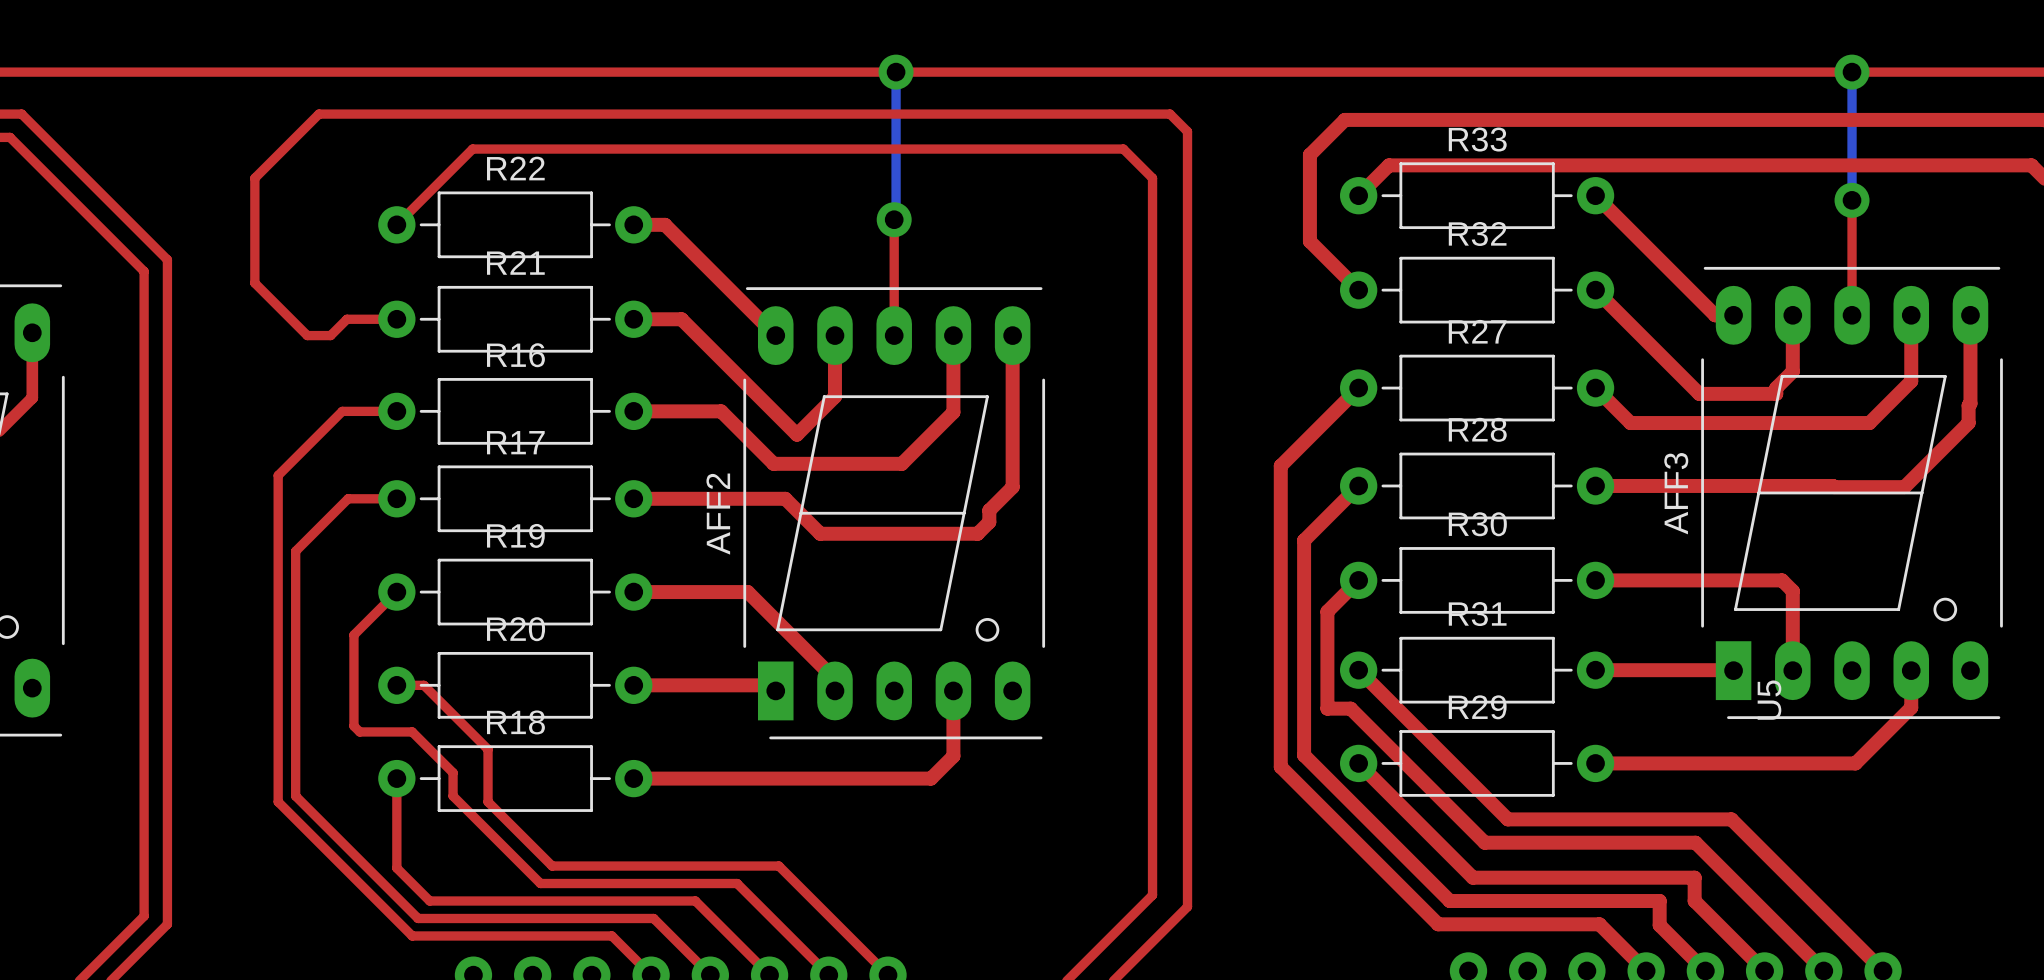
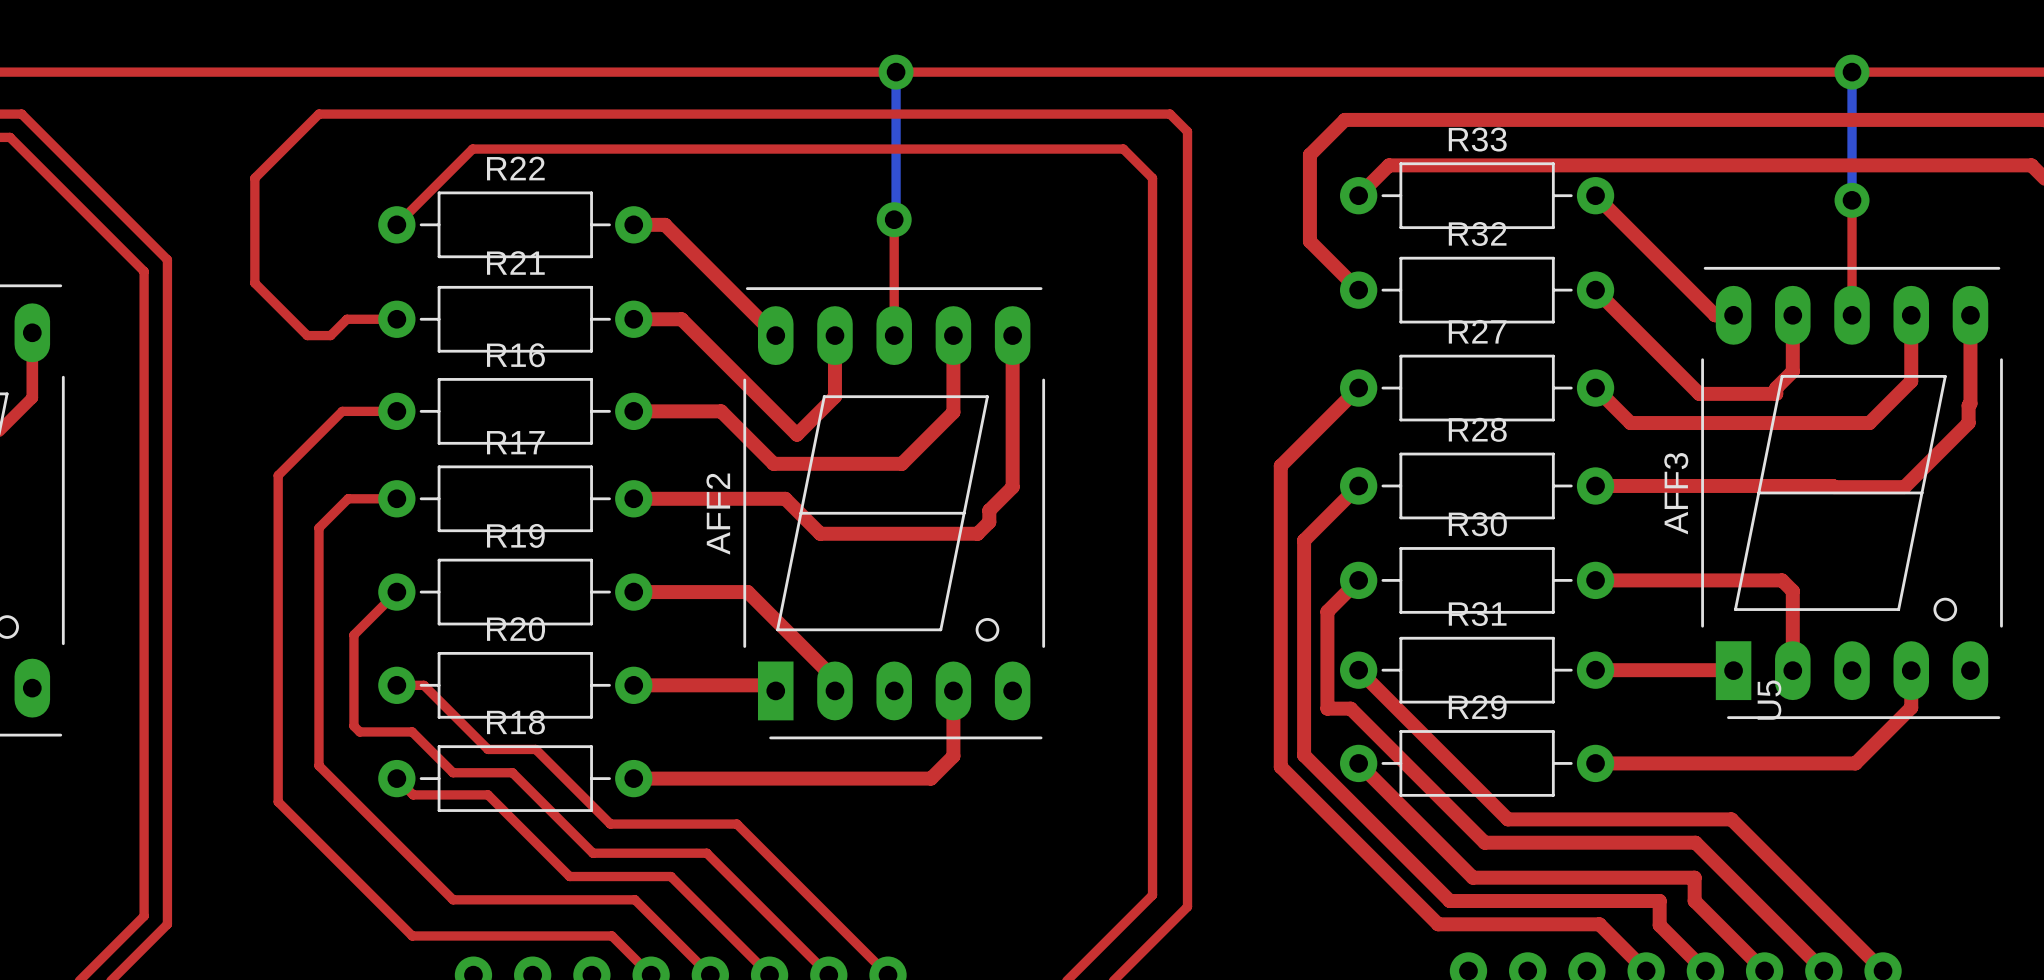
top track: (318, 527) (295, 551) (295, 796) (418, 918) (653, 918) -> (318, 527) (318, 765) (453, 899) (635, 899) (653, 918)
top track: (488, 749) (488, 801) (552, 866) (778, 866) -> (488, 749) (535, 749) (610, 824) (736, 824) (778, 866)
top track: (453, 772) (453, 796) (540, 883) (737, 883) -> (453, 772) (512, 772) (592, 853) (706, 853) (737, 883)
top track: (396, 778) (396, 868) (429, 901) (695, 901) -> (396, 778) (413, 794) (488, 794) (569, 876) (670, 876) (695, 901)

